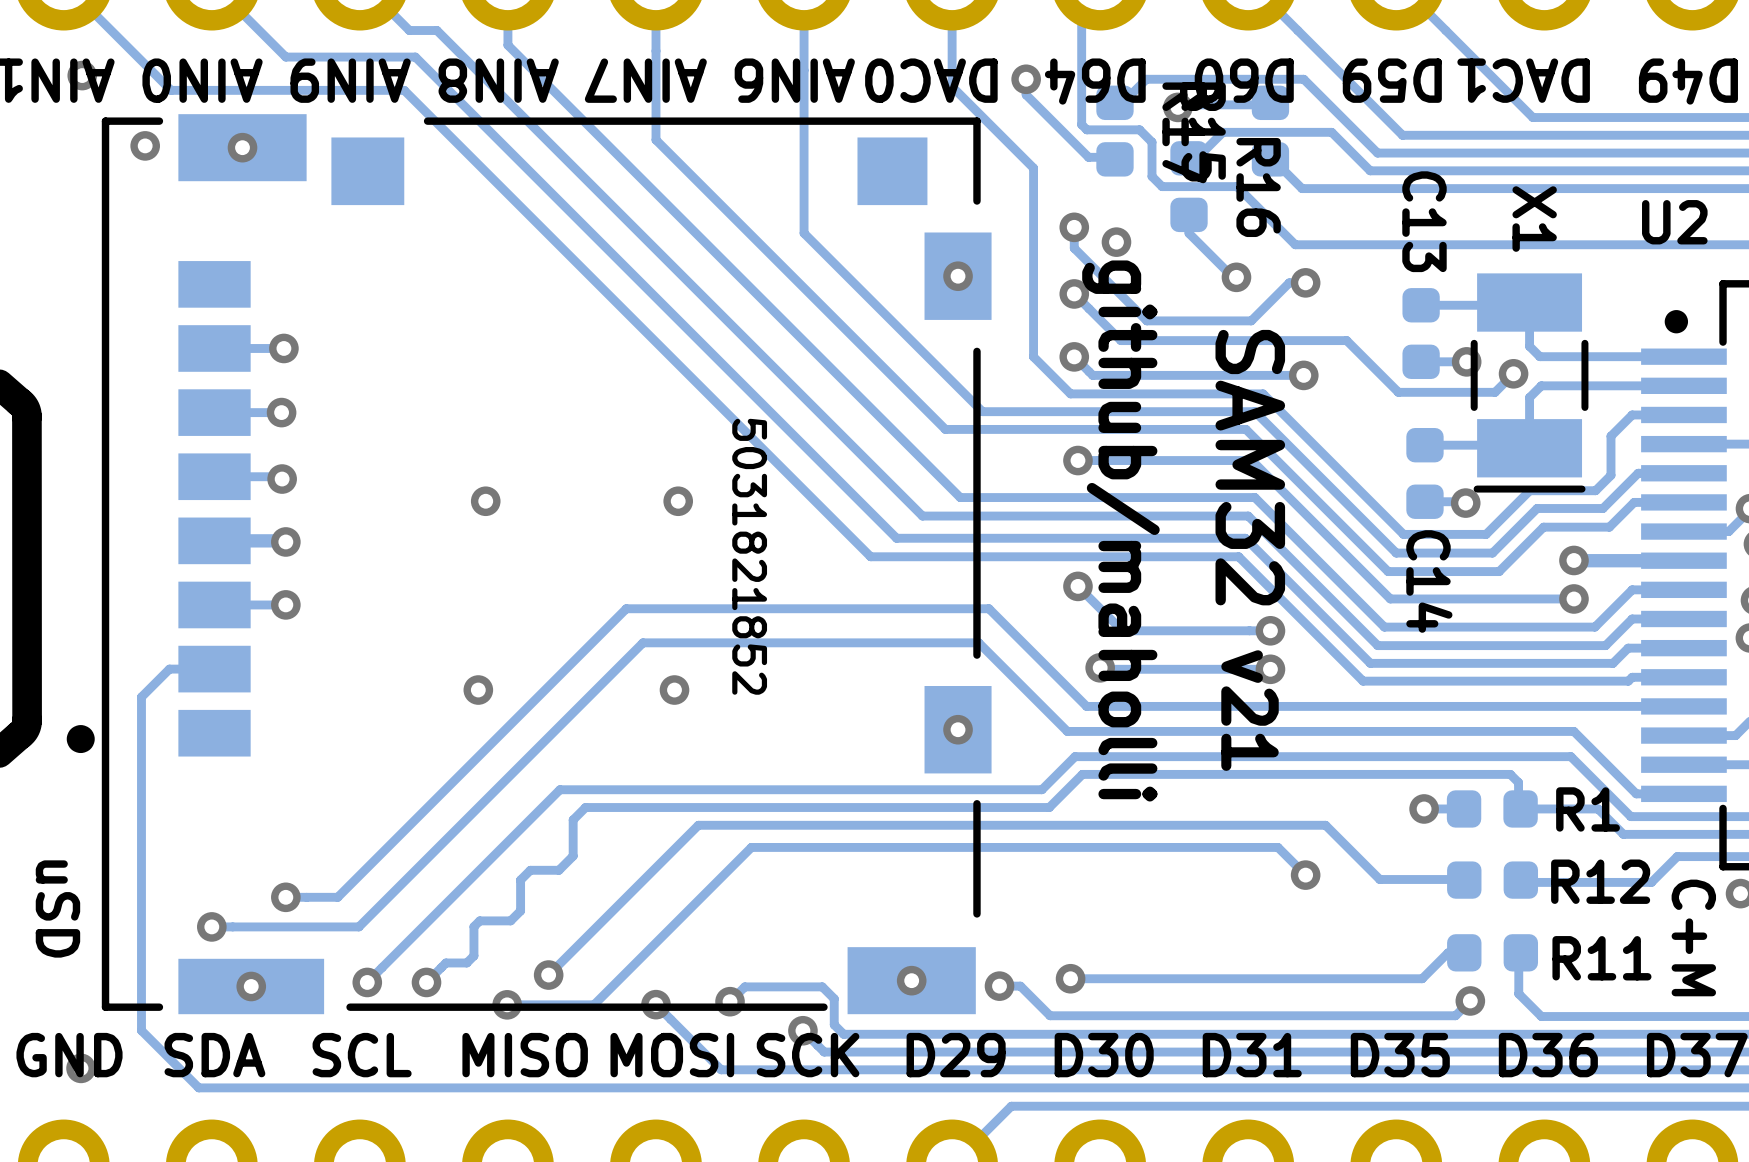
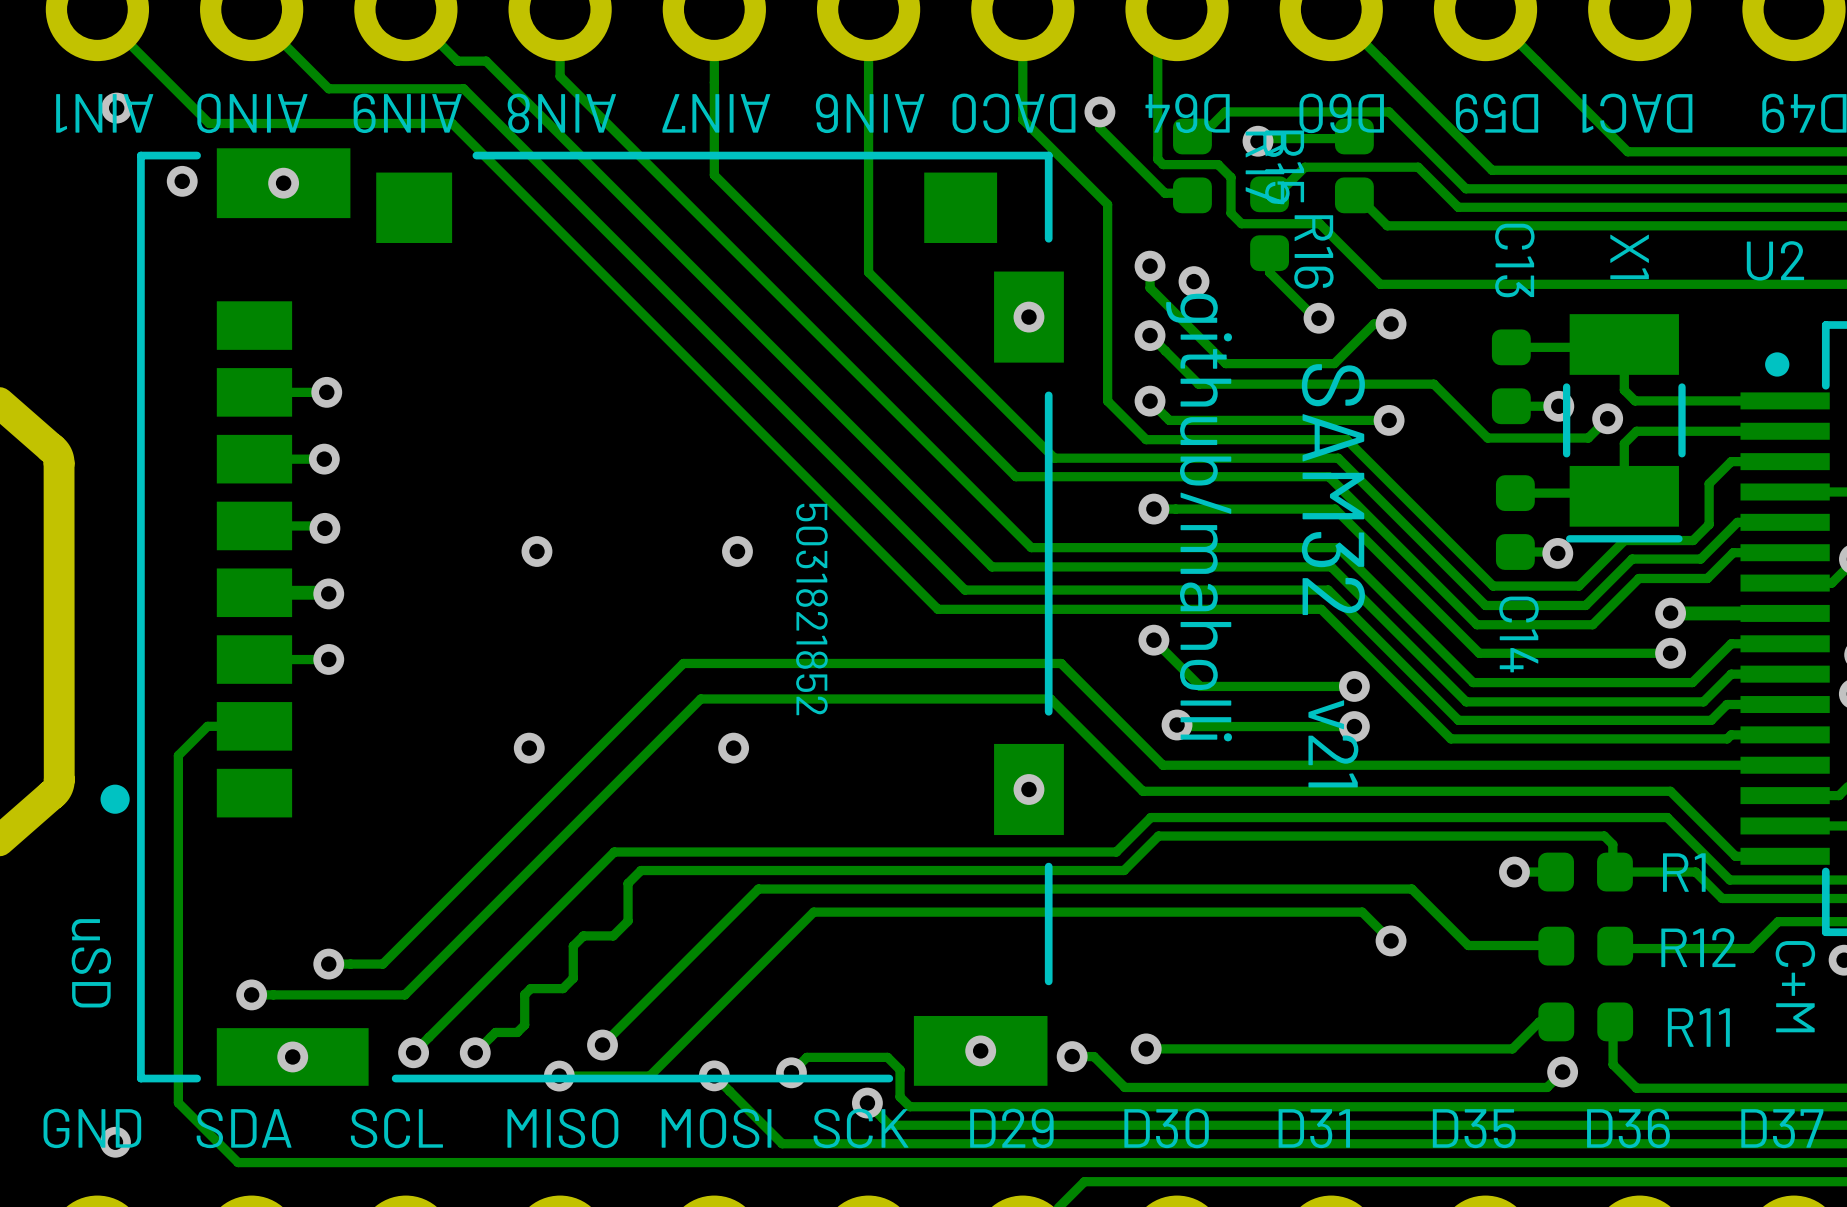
R16 name position: R16 (1258, 187) -> R16 (1313, 251)

